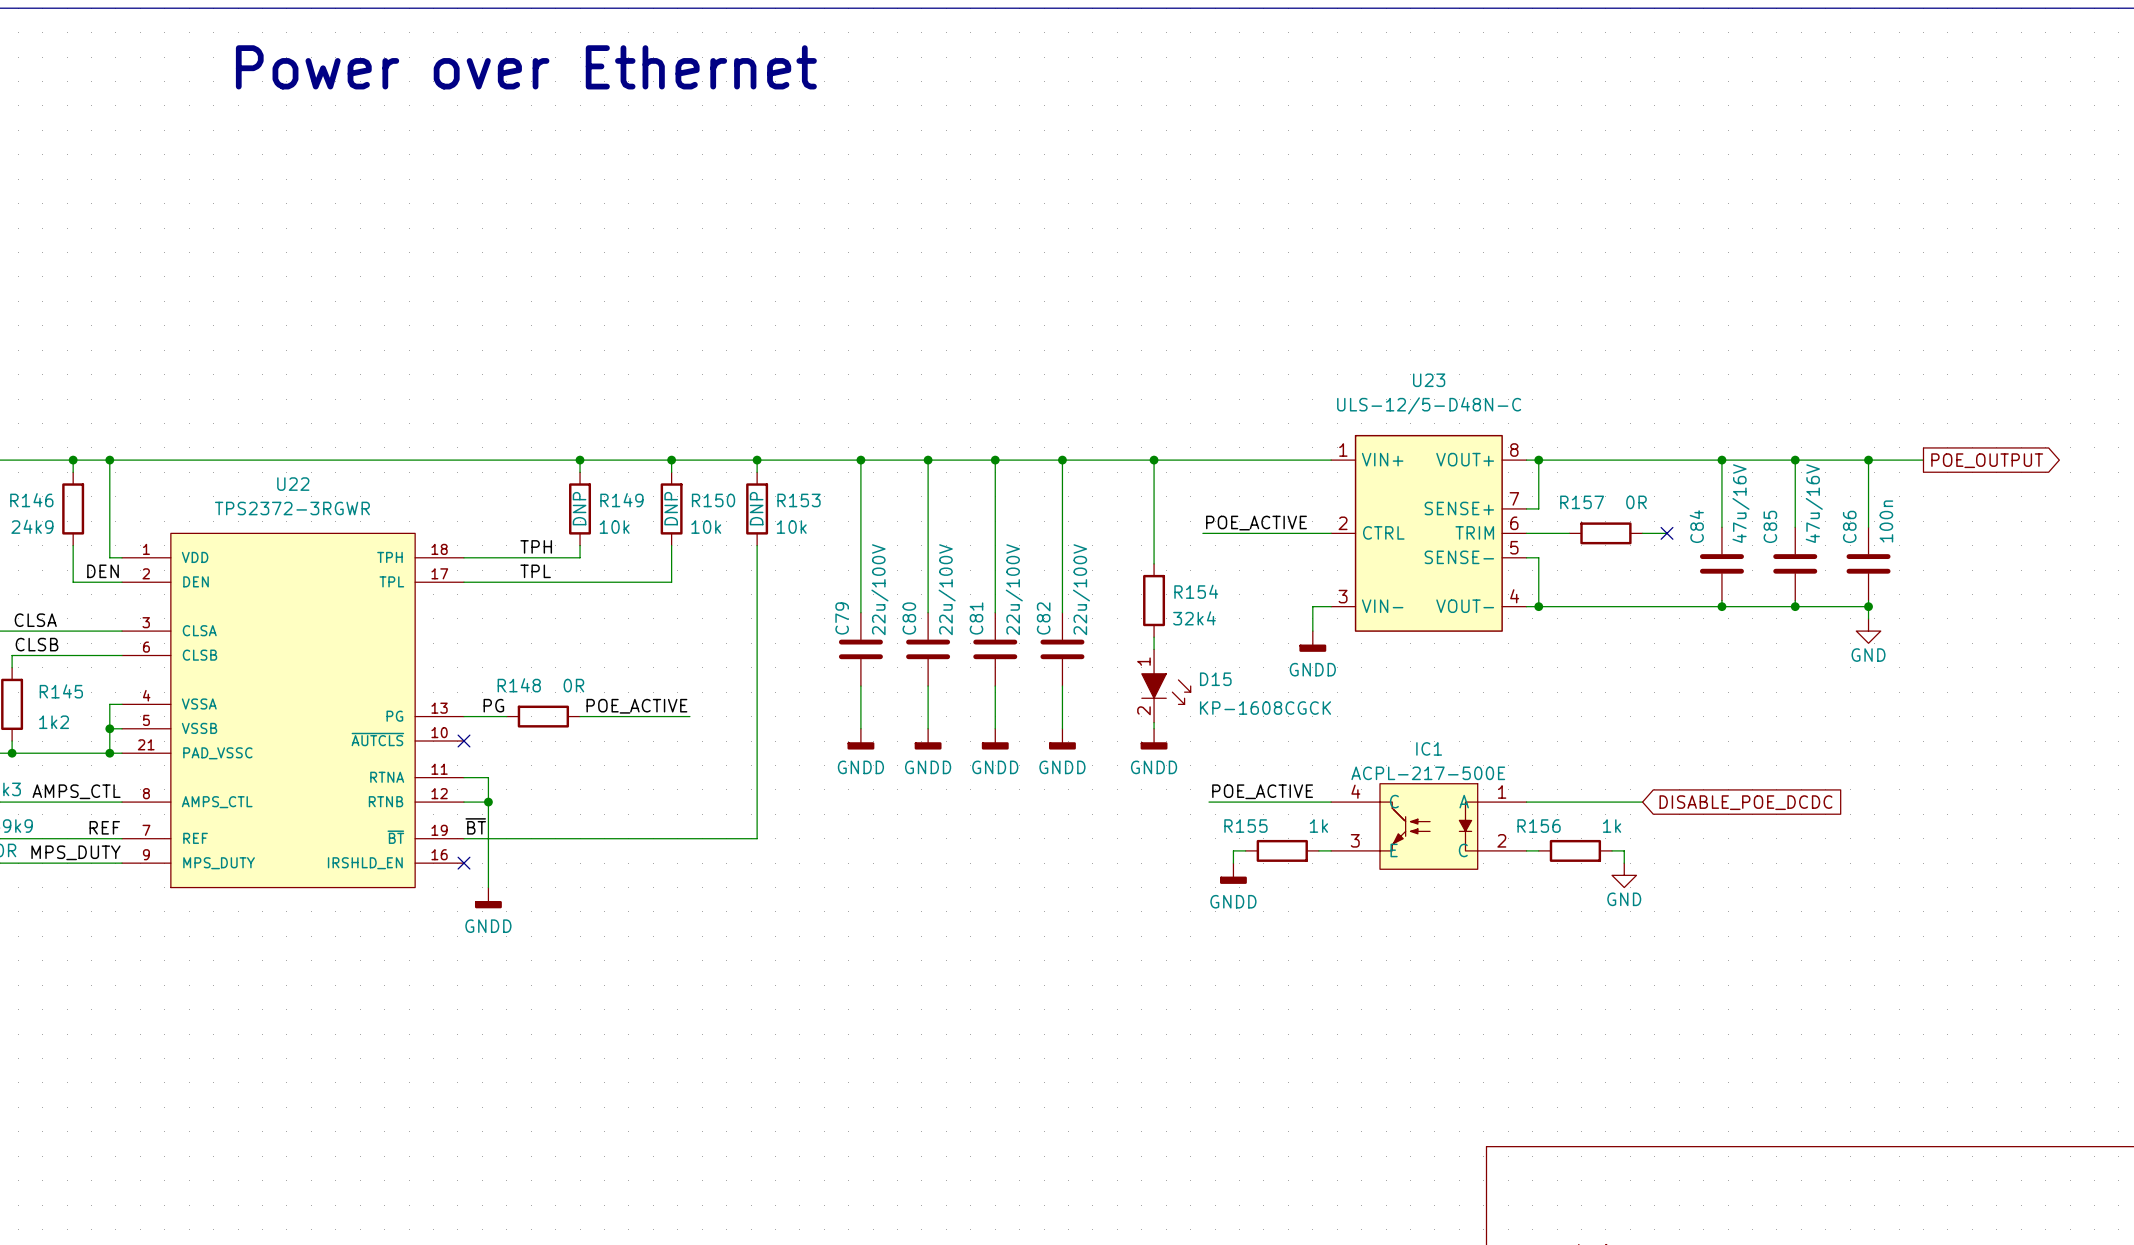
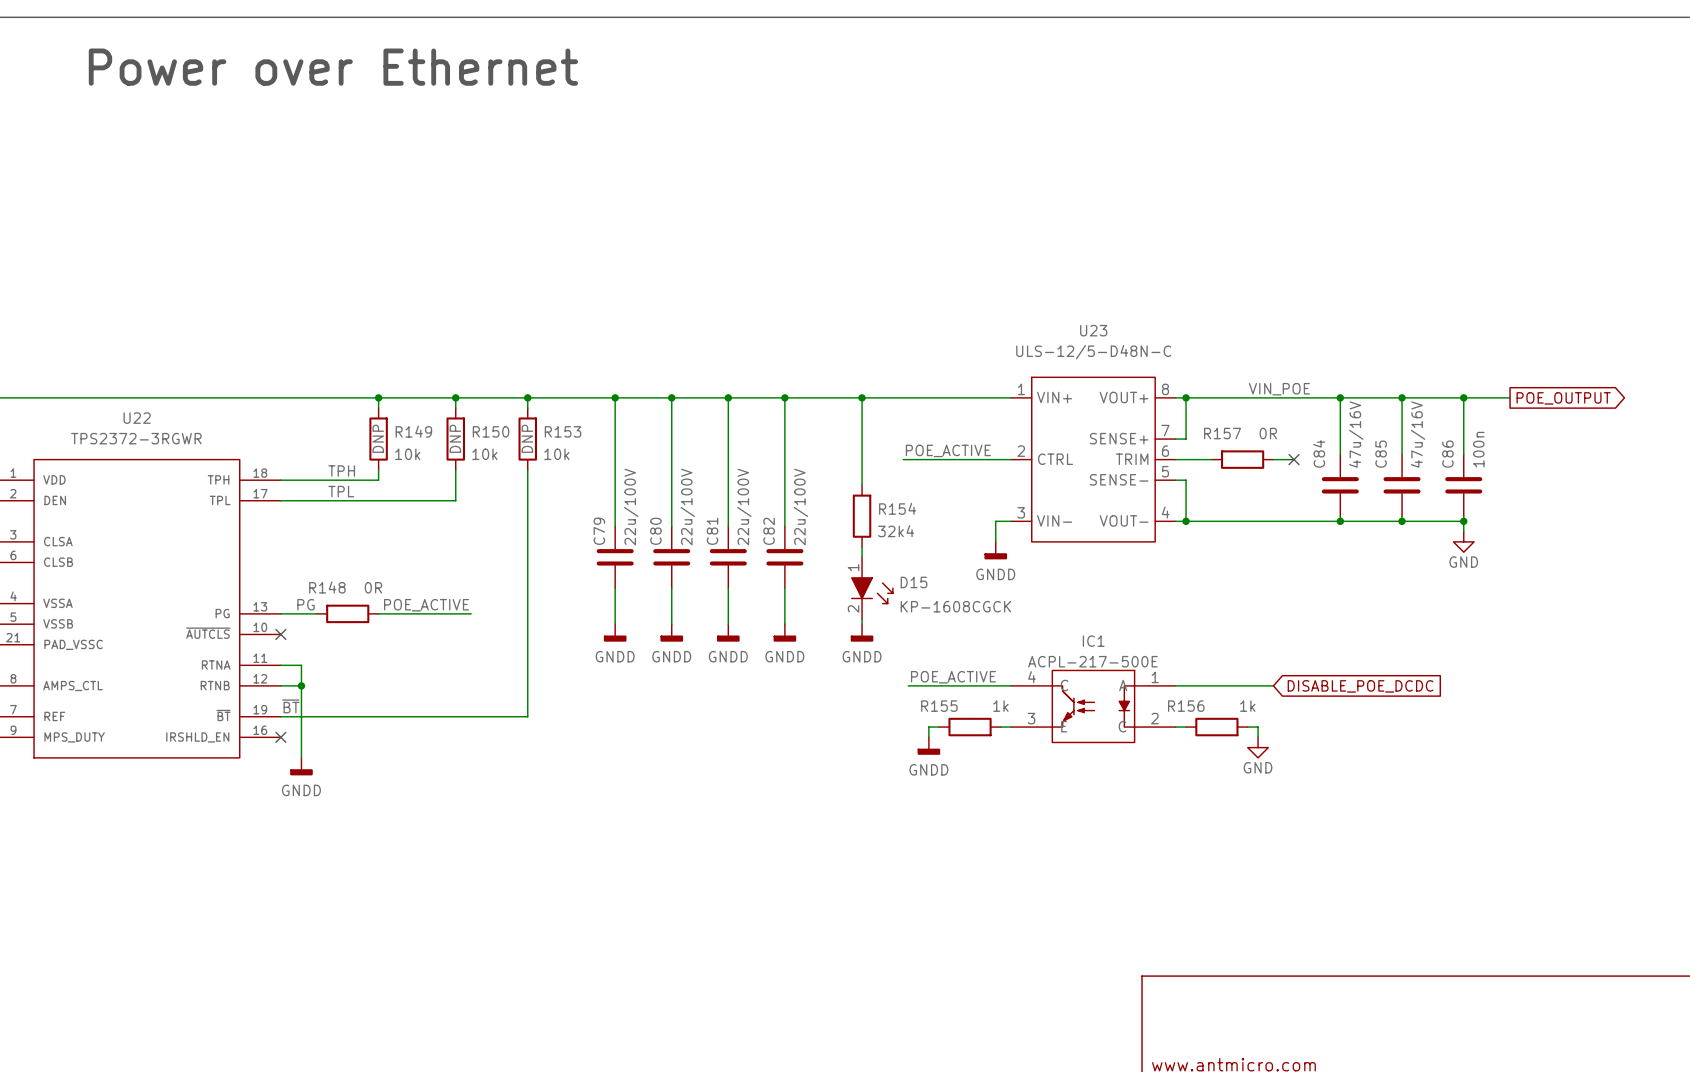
label: none -> VIN_POE (1279, 389)

